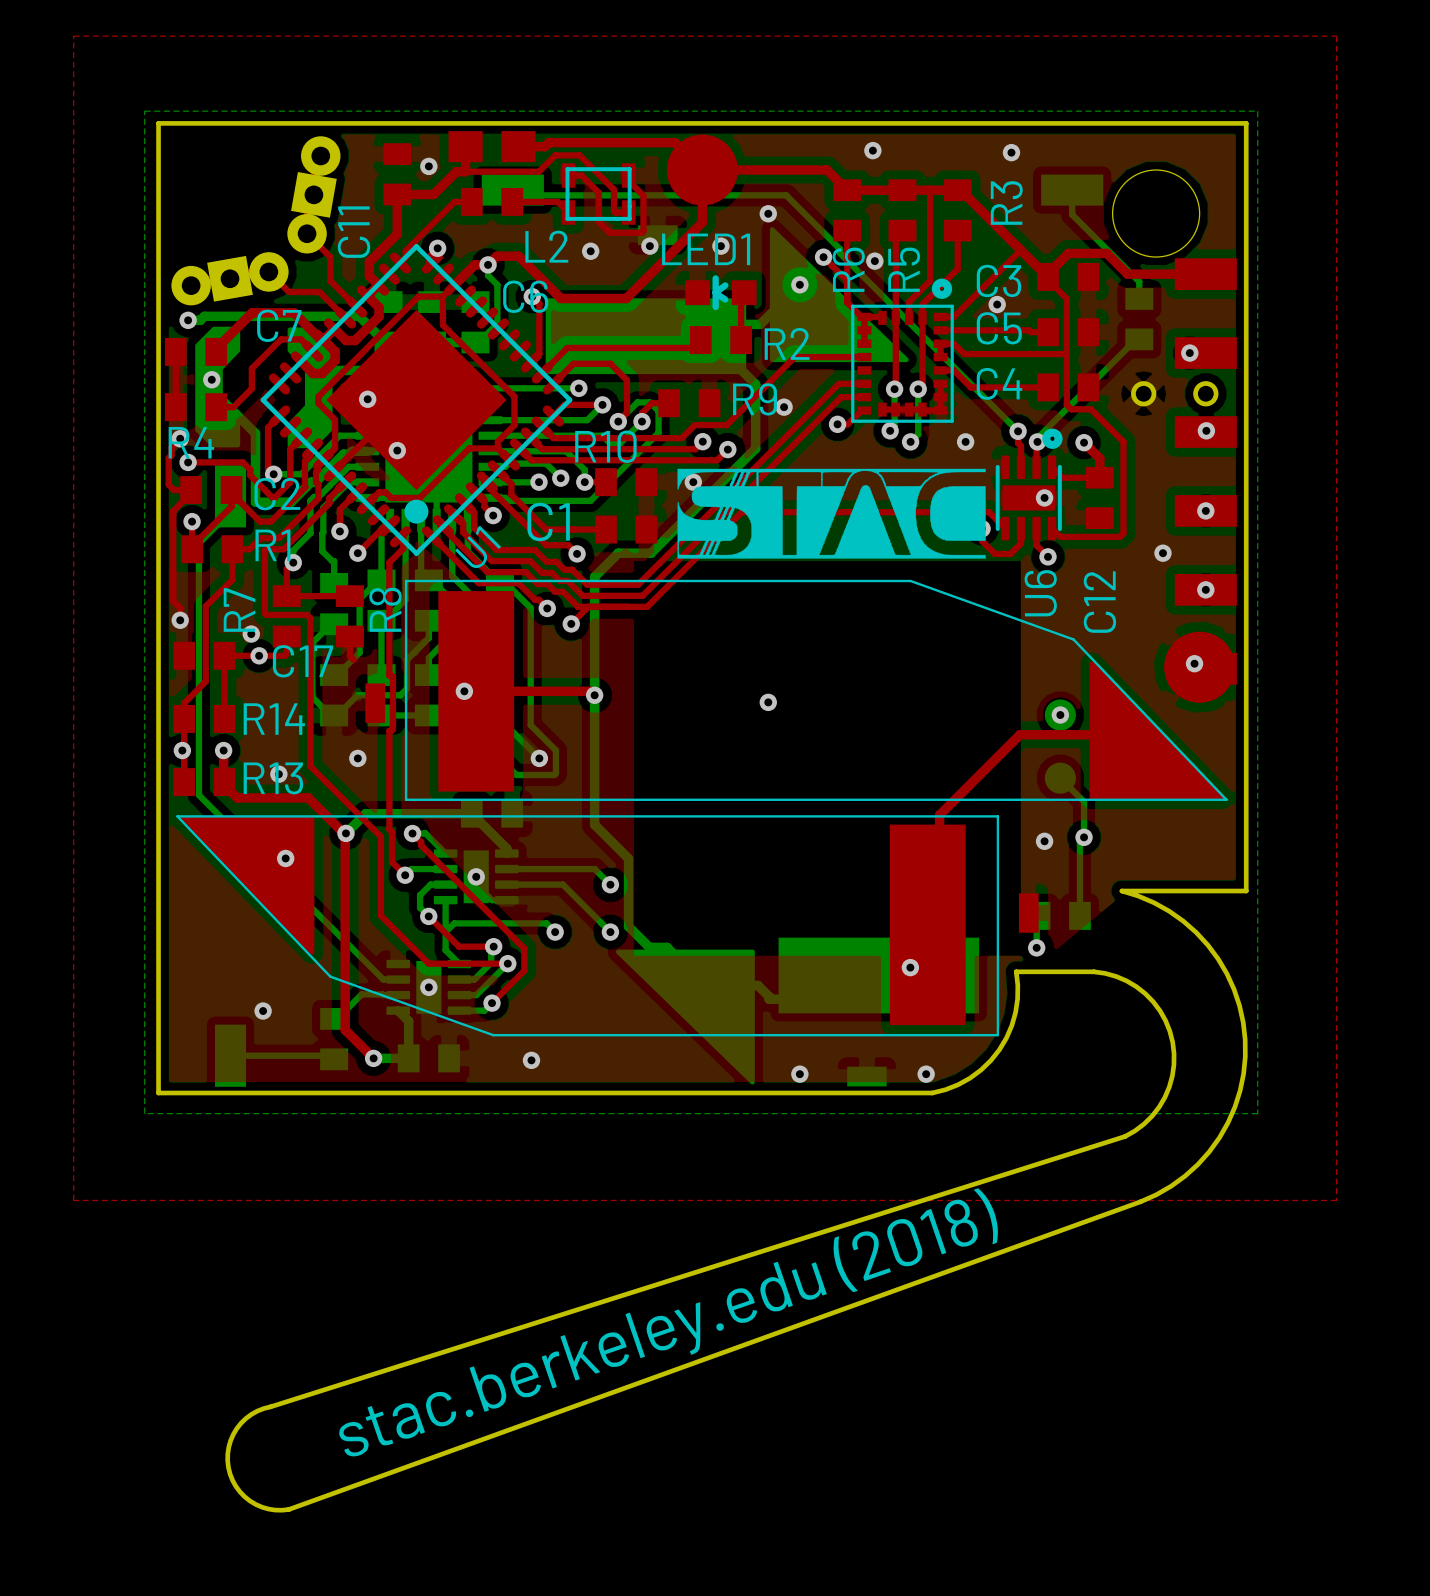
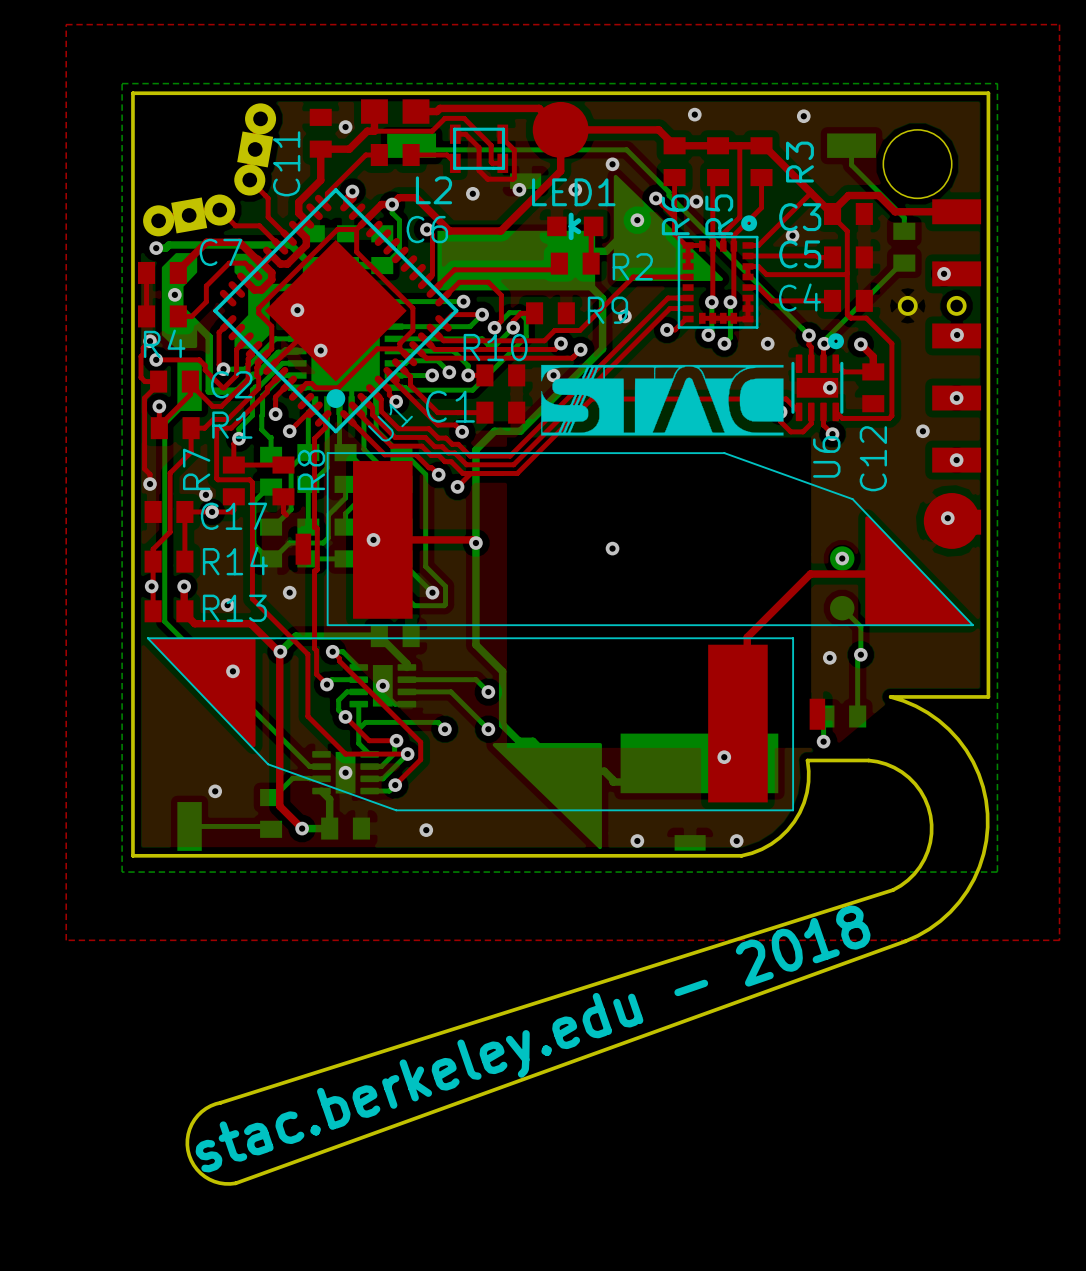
text: stac.berkeley.edu (2018) (668, 1322) -> stac.berkeley.edu - 2018 (533, 1038)

